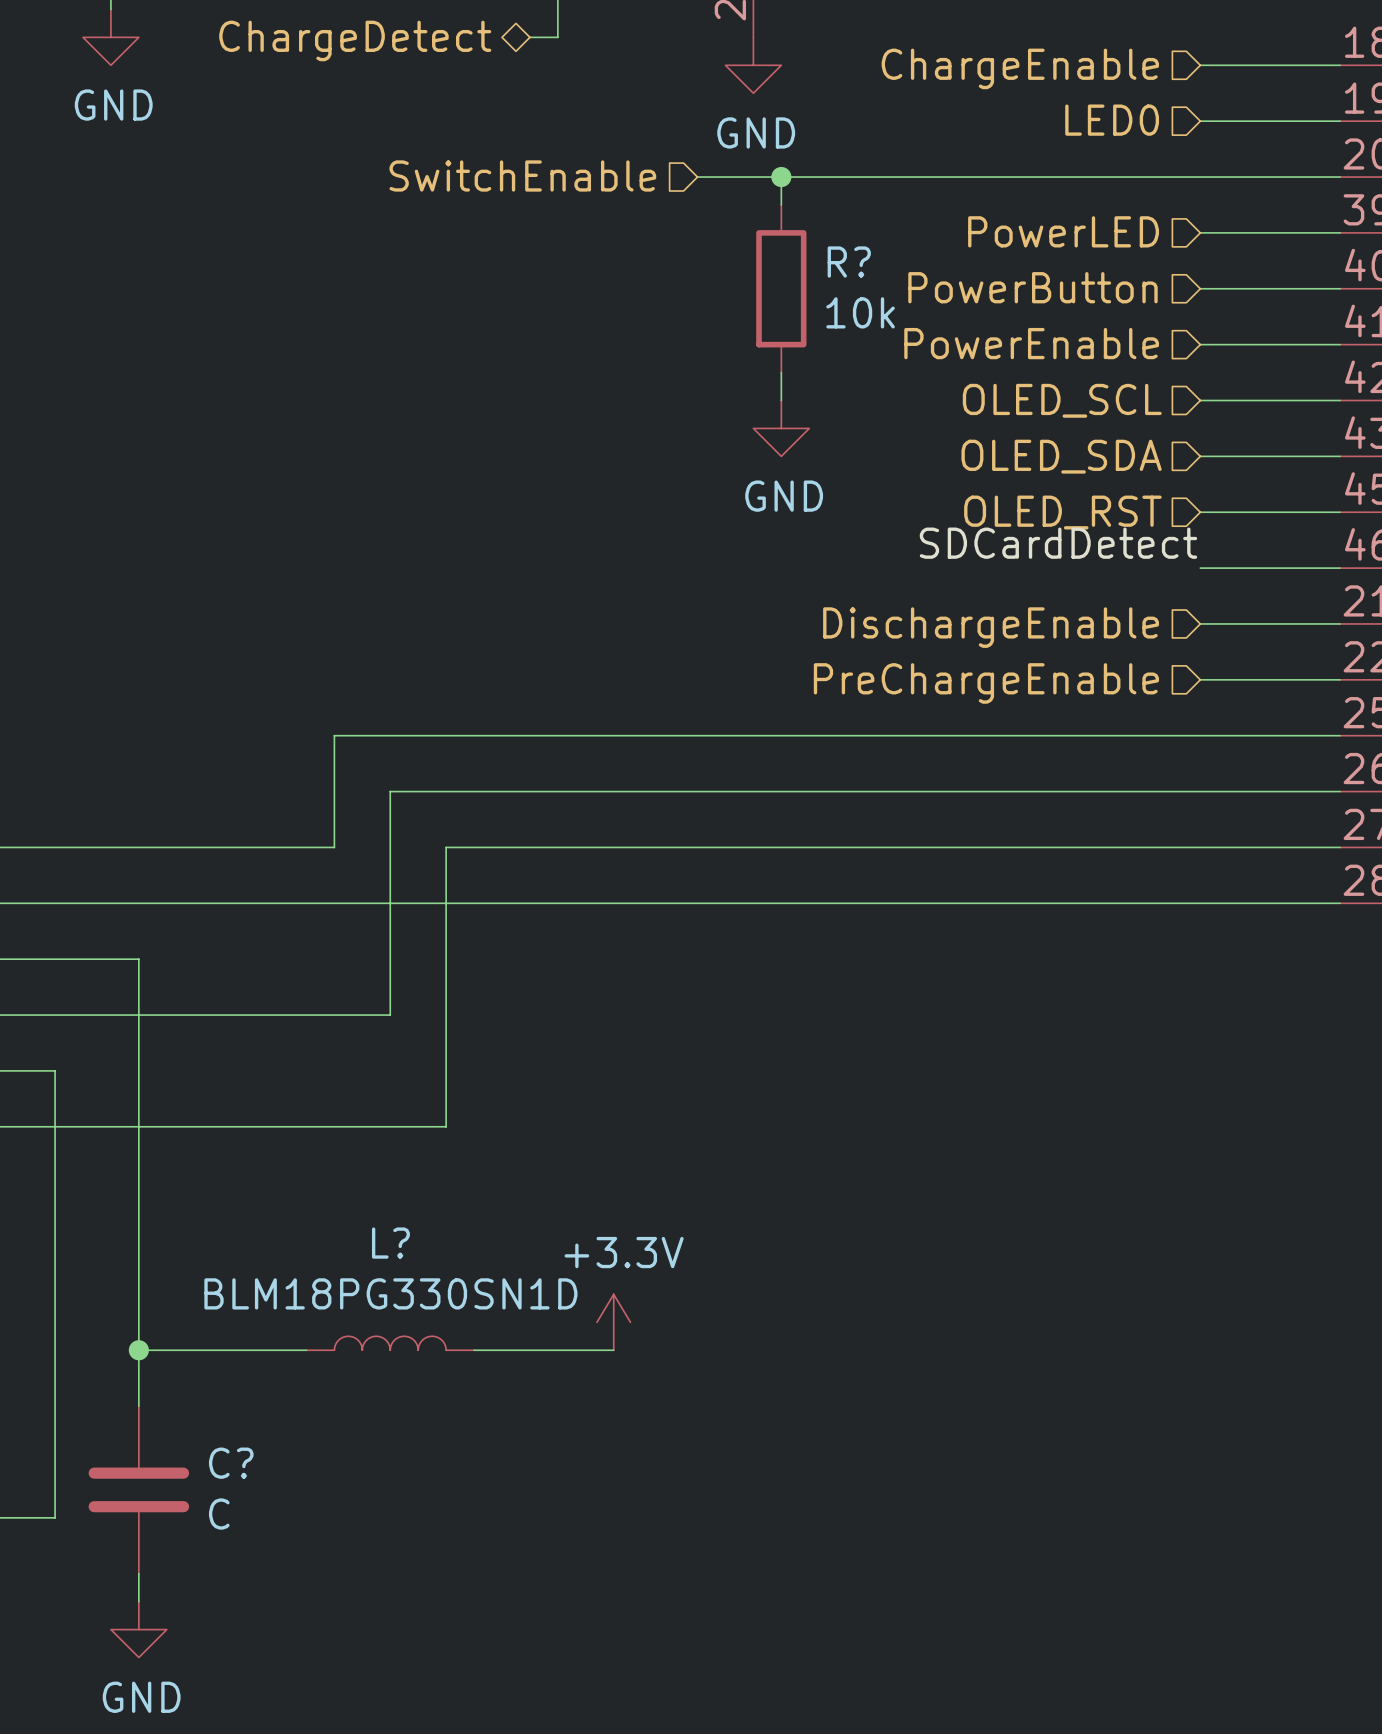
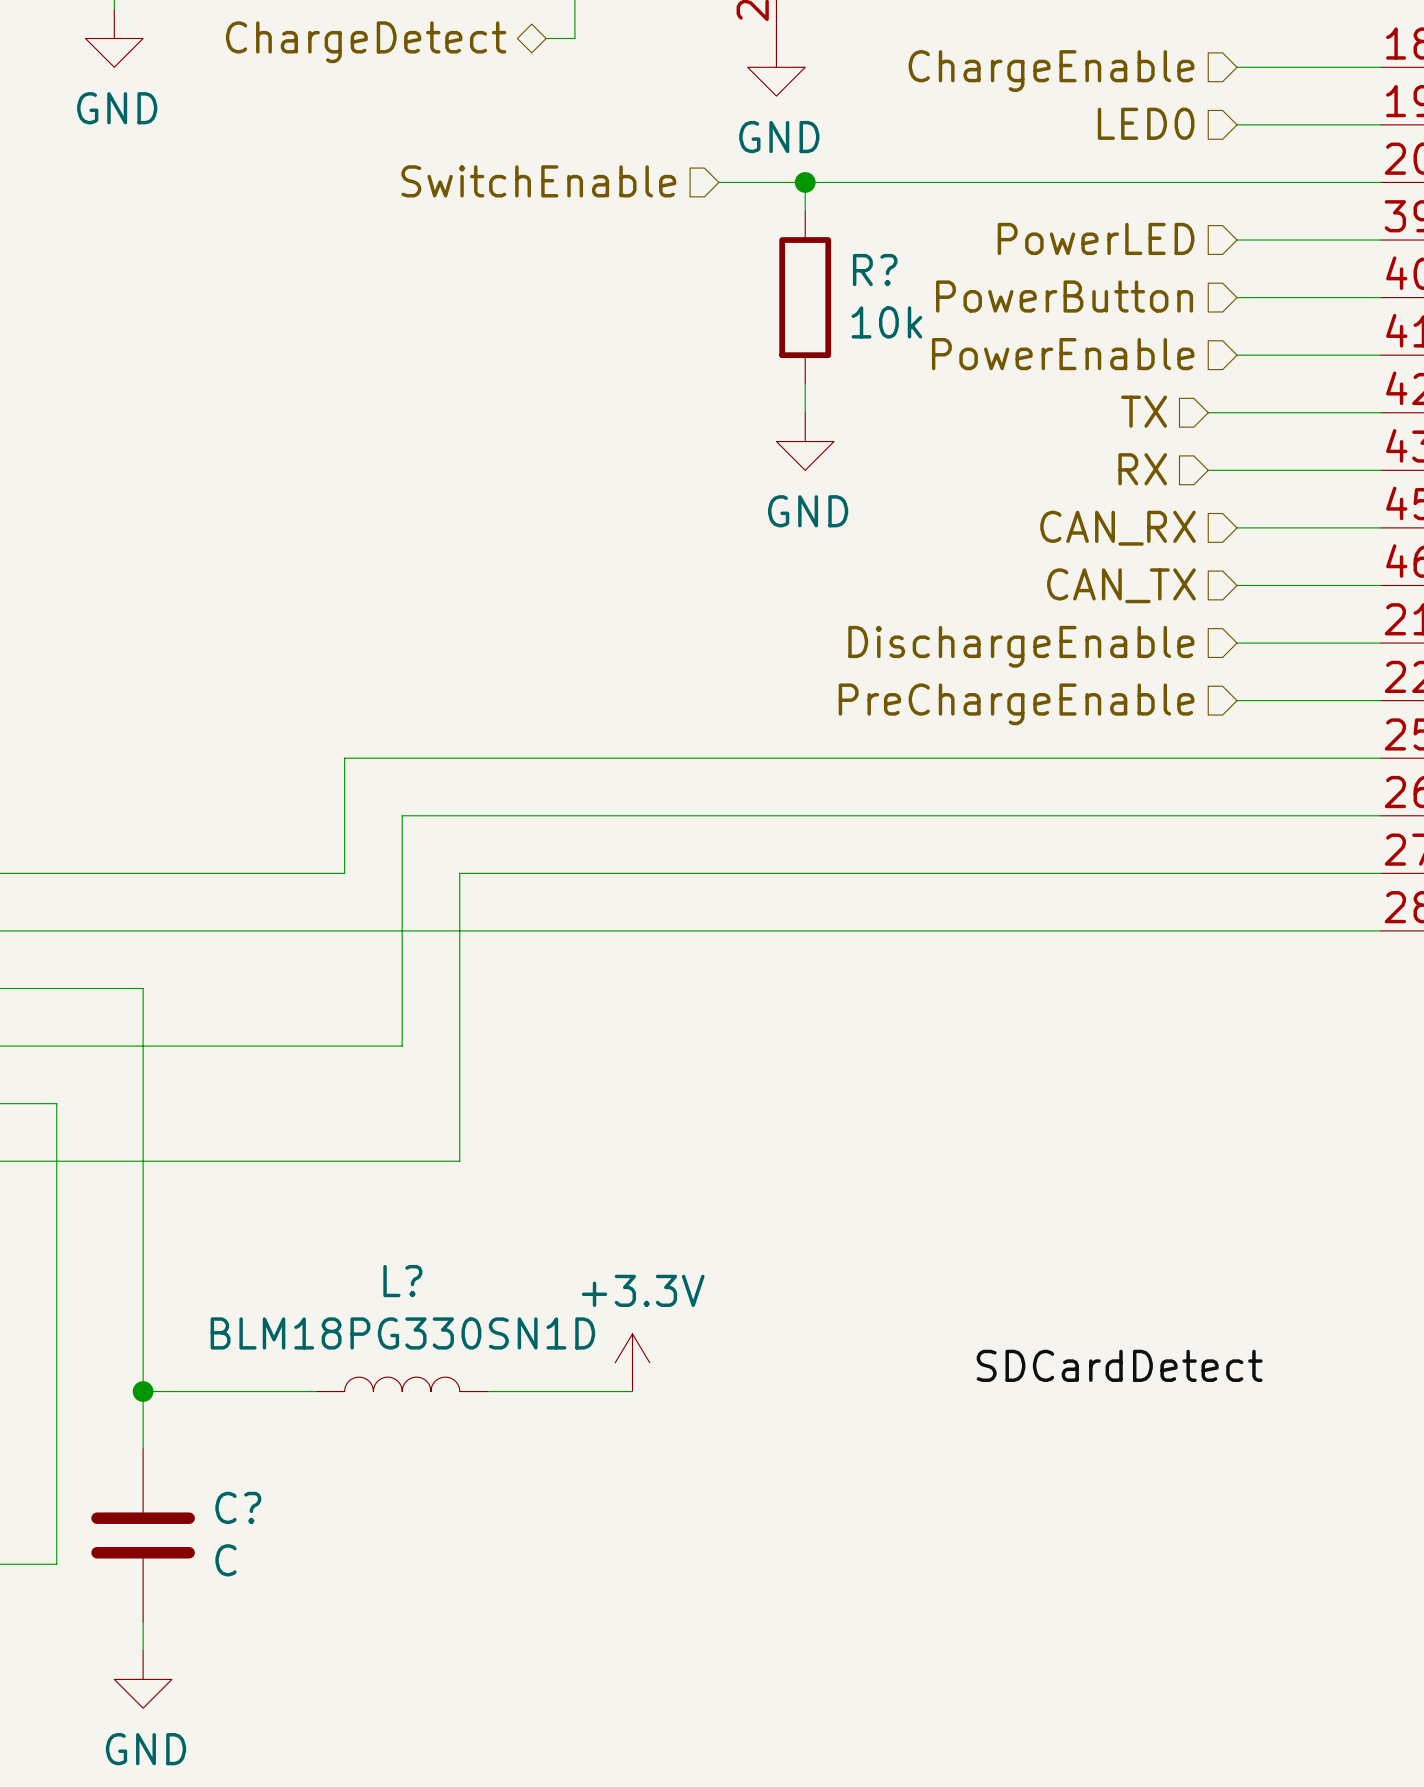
hierarchical label: none -> TX (1144, 411)
hierarchical label: OLED_SCL (1062, 400) -> none
wire: none -> (1208, 412) (1237, 412)
hierarchical label: none -> RX (1142, 469)
hierarchical label: OLED_SDA (1061, 456) -> none
wire: none -> (1208, 470) (1237, 470)
hierarchical label: OLED_RST (1062, 512) -> CAN_RX (1118, 528)
label: SDCardDetect (1058, 543) -> none
hierarchical label: none -> CAN_TX (1121, 585)
label: none -> SDCardDetect (1119, 1365)

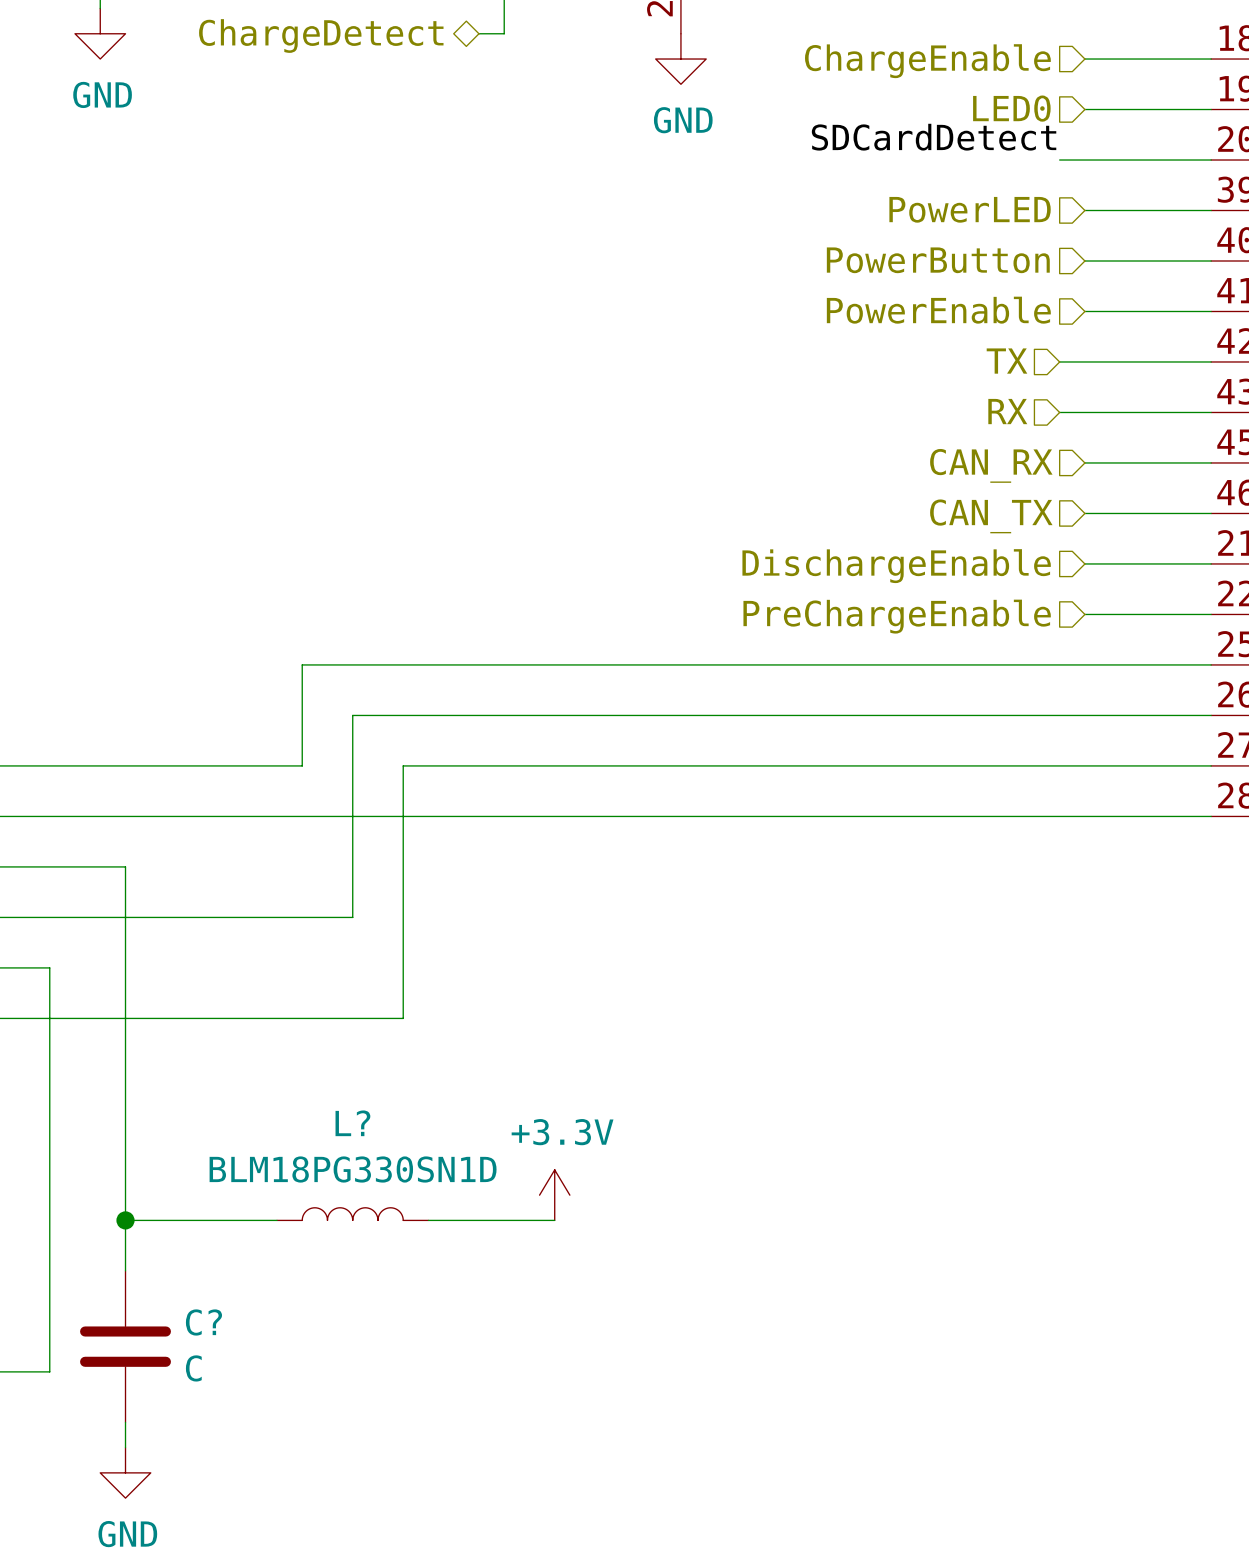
label: none -> SDCardDetect (934, 137)
hierarchical label: SwitchEnable (538, 181) -> none
wire: (718, 182) (1208, 182) -> none
wire: (805, 182) (805, 211) -> none
junction: (805, 182) -> none
R?: 10k (805, 297) -> none
wire: (805, 383) (805, 412) -> none
power symbol: GND (805, 441) -> none
label: SDCardDetect (1119, 1365) -> none

